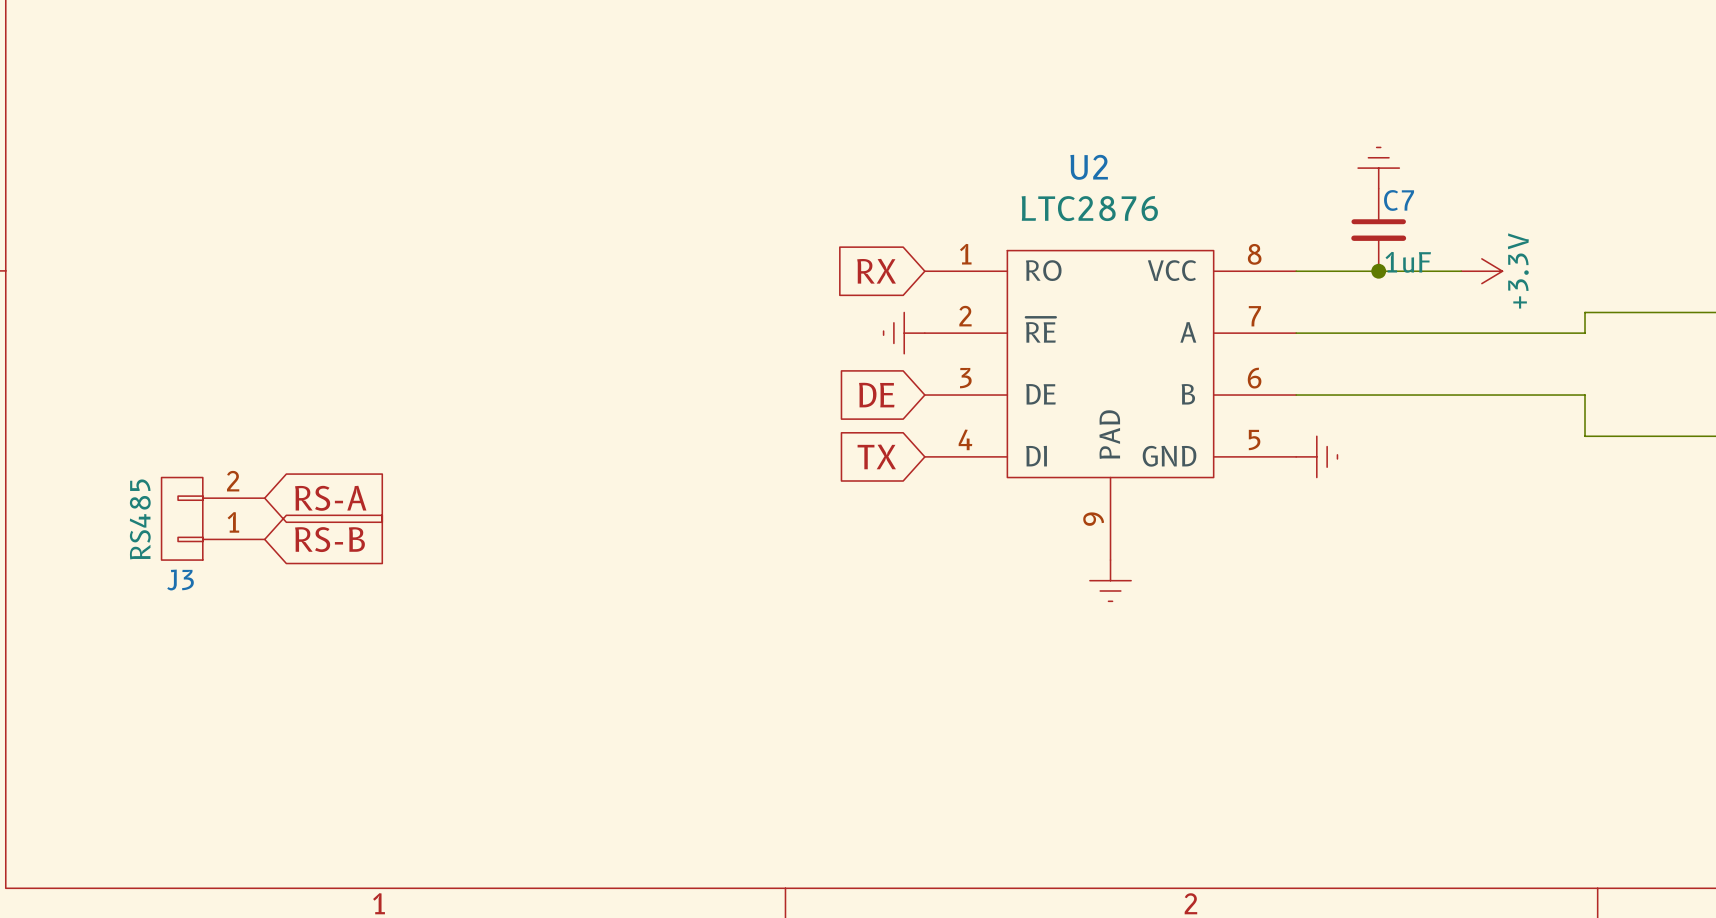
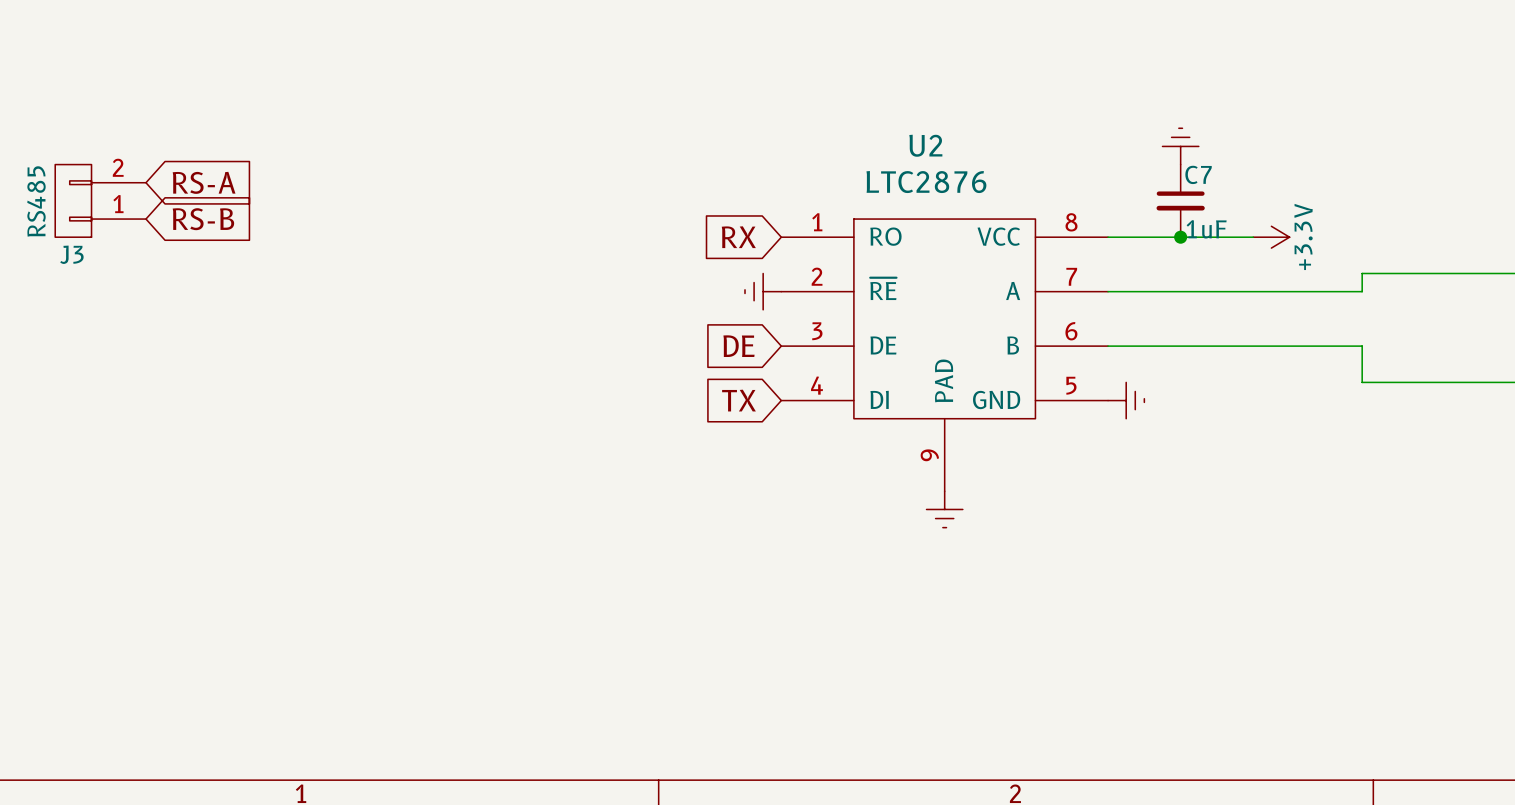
global label position: RS-A (330, 498) -> RS-A (204, 182)
J3 position: (213, 518) -> (100, 200)
global label position: RS-B (329, 539) -> RS-B (203, 219)

